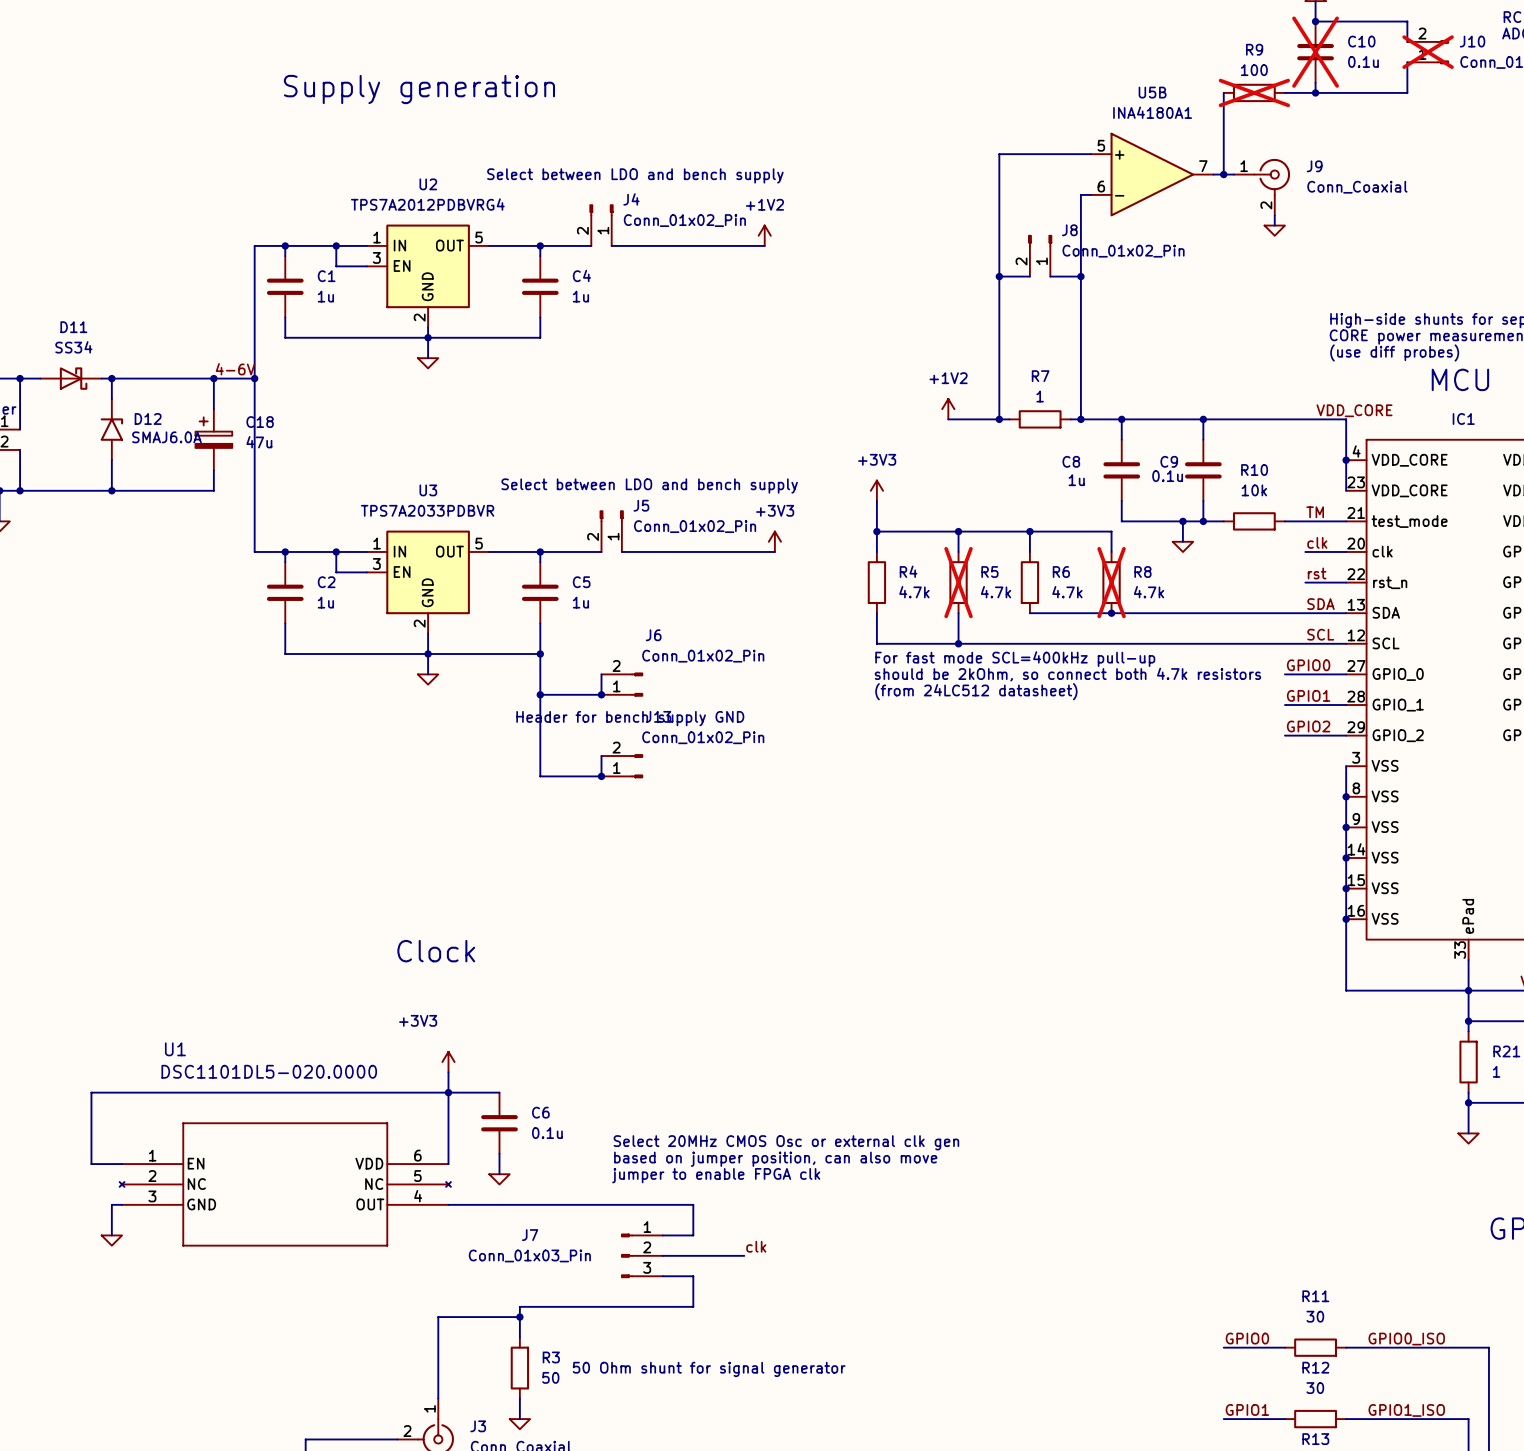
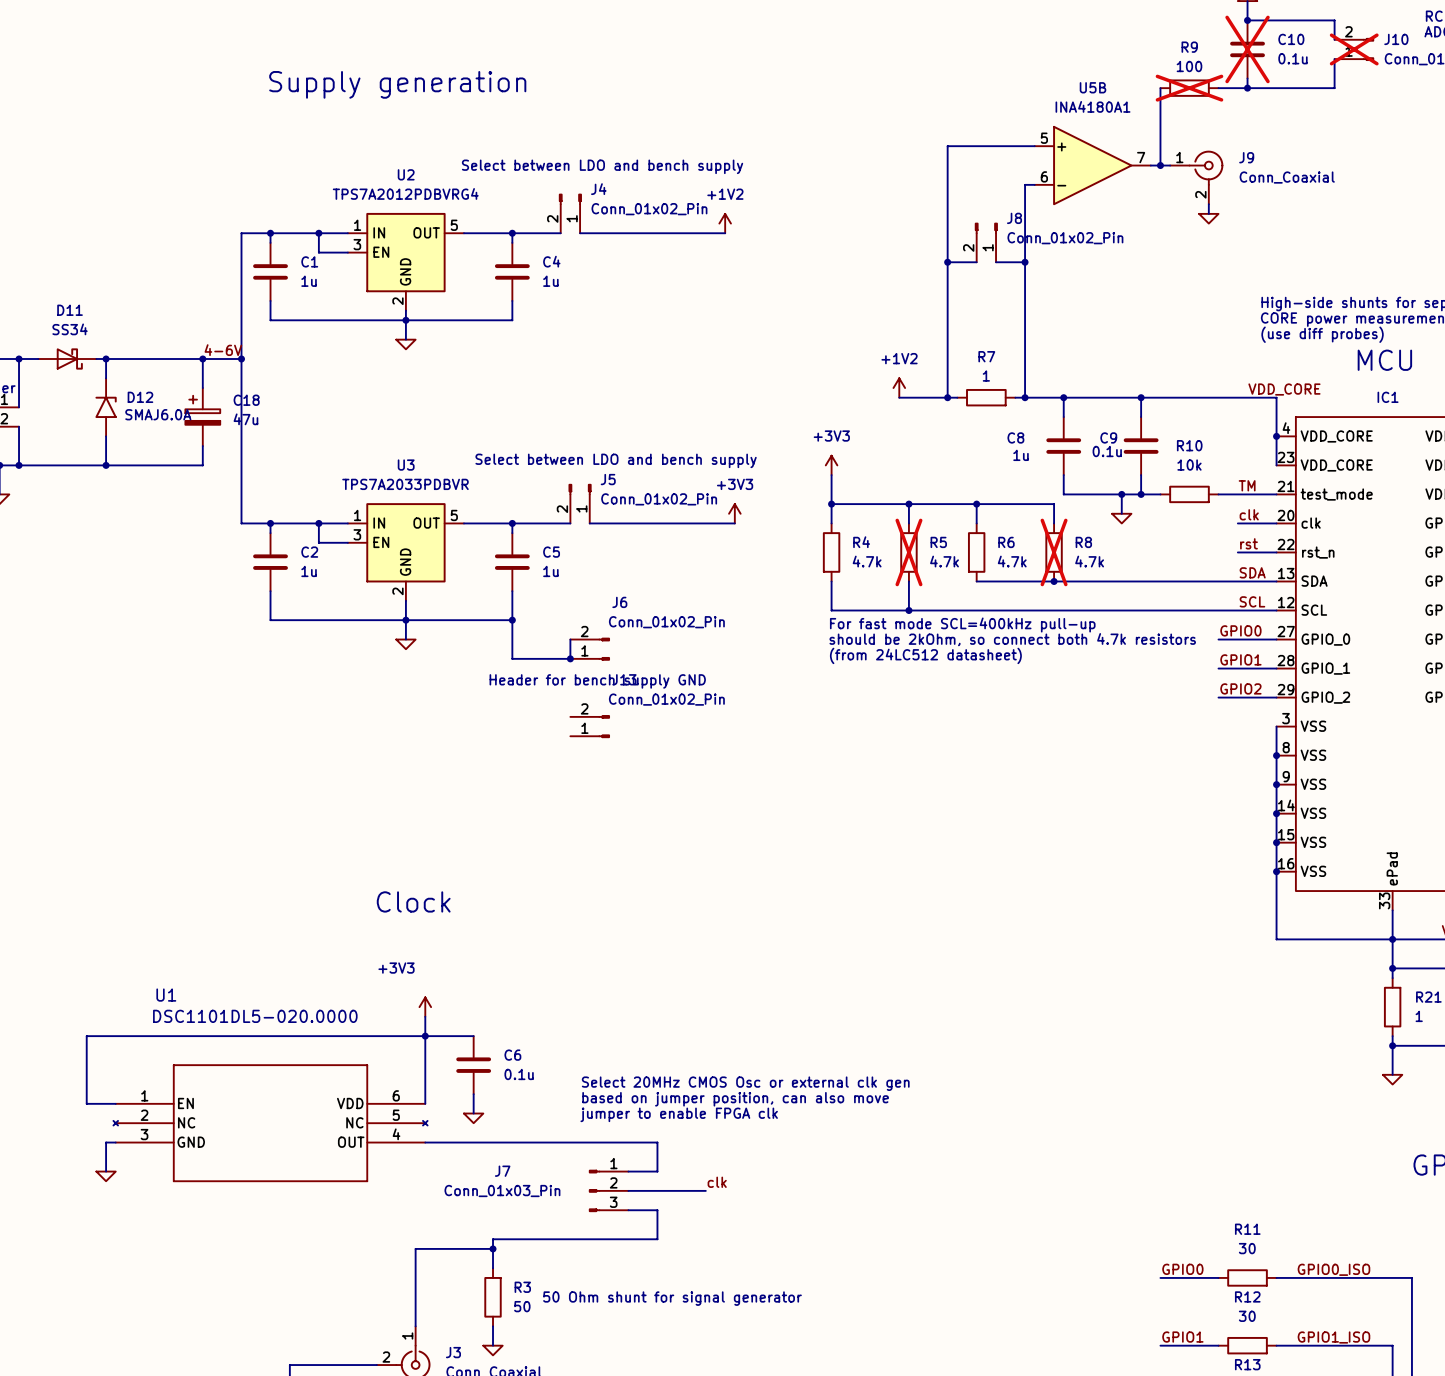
wire: (540, 694) (540, 776) (601, 776) (601, 756) -> none
junction: (540, 694) -> none
junction: (601, 776) -> none

